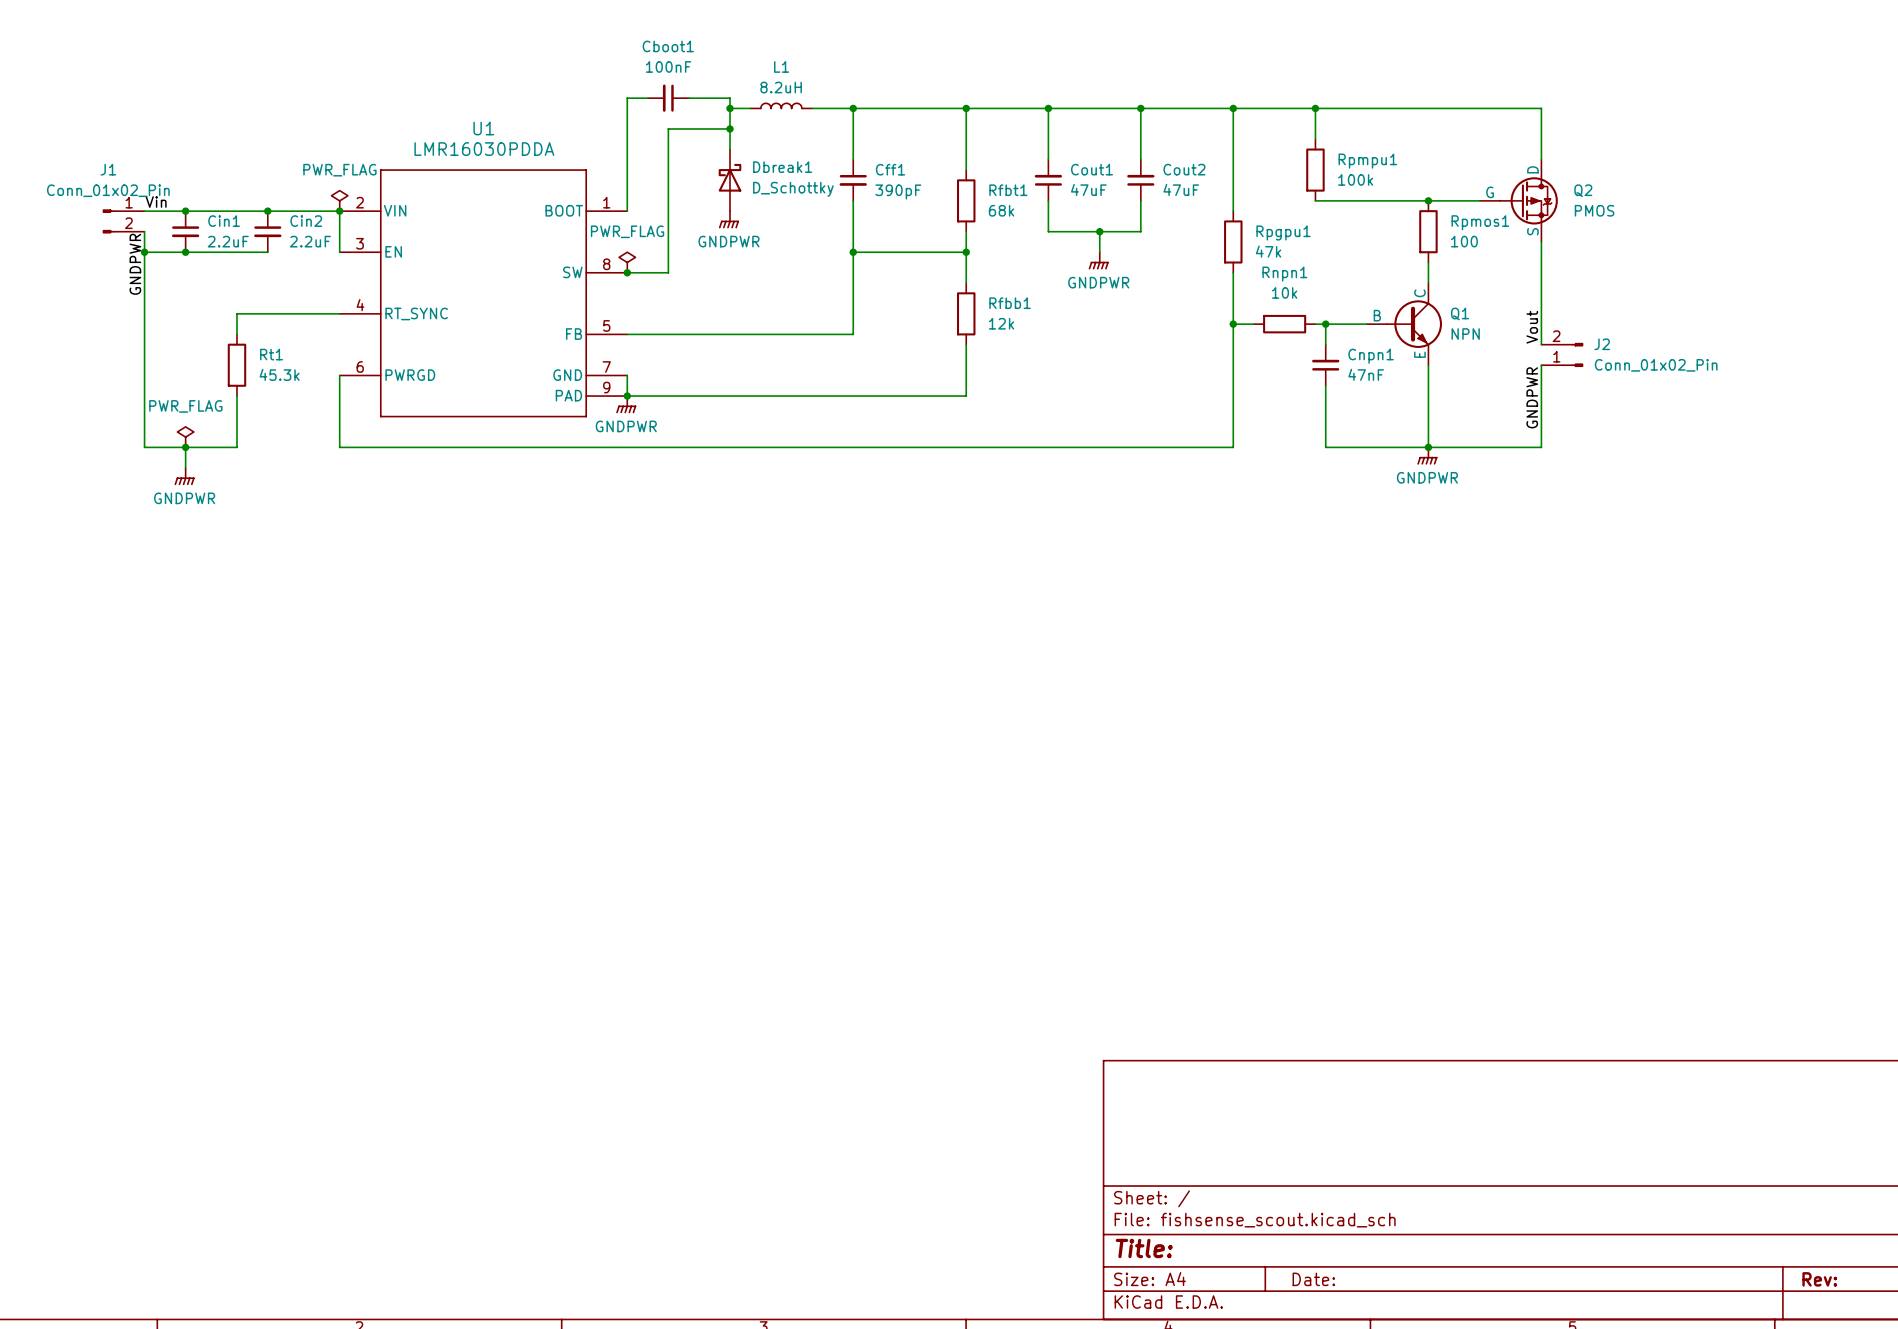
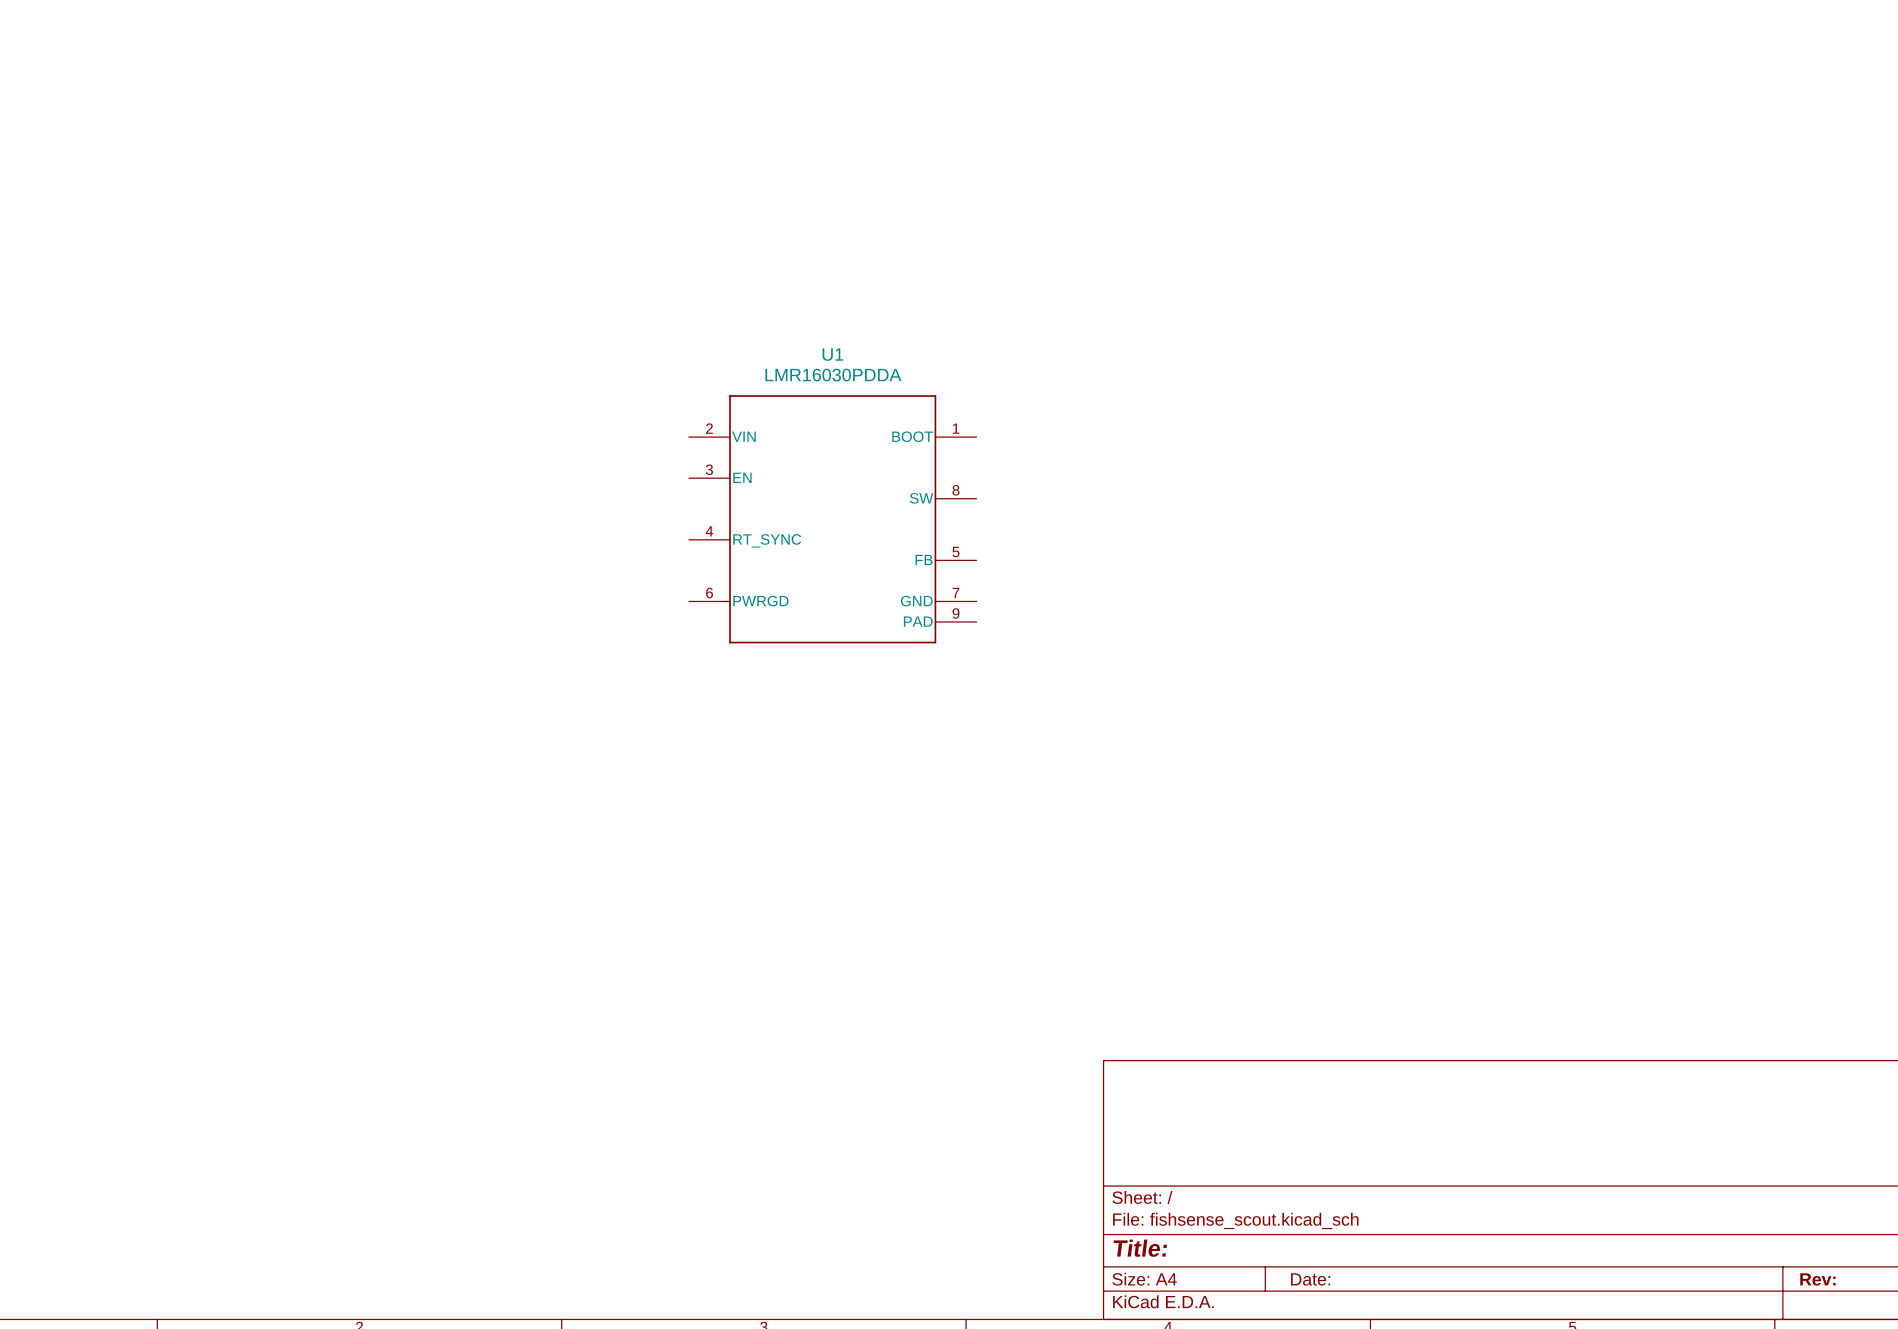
wire: (647, 98) (627, 98) (627, 211) -> none
Cboot1: 100nF (668, 98) -> none
wire: (688, 98) (730, 98) (730, 149) -> none
L1: 8.2uH (781, 105) -> none
wire: (730, 108) (750, 108) -> none
junction: (730, 108) -> none
wire: (812, 108) (1541, 108) (1541, 159) -> none
wire: (853, 108) (853, 159) -> none
junction: (853, 108) -> none
wire: (966, 108) (966, 170) -> none
junction: (966, 108) -> none
wire: (1048, 108) (1048, 159) -> none
junction: (1048, 108) -> none
wire: (1140, 108) (1140, 159) -> none
junction: (1140, 108) -> none
wire: (1233, 108) (1233, 211) -> none
junction: (1233, 108) -> none
wire: (1315, 108) (1315, 139) -> none
junction: (1315, 108) -> none
wire: (730, 128) (668, 128) (668, 272) (627, 272) -> none
junction: (730, 128) -> none
Rpmpu1: 100k (1315, 170) -> none
Dbreak1: D_Schottky (730, 180) -> none
Cff1: 390pF (853, 180) -> none
Cout1: 47uF (1048, 180) -> none
Cout2: 47uF (1140, 180) -> none
power symbol: PWR_FLAG (339, 200) -> none
wire: (853, 200) (853, 334) (627, 334) -> none
Rfbt1: 68k (966, 200) -> none
wire: (1048, 200) (1048, 231) (1140, 231) (1140, 200) -> none
wire: (1315, 200) (1479, 200) -> none
junction: (1428, 200) -> none
Q2: PMOS (1518, 200) -> none
label: Vin (156, 201) -> none
wire: (144, 211) (339, 211) (339, 252) -> none
junction: (185, 211) -> none
junction: (267, 211) -> none
junction: (339, 211) -> none
power symbol: GNDPWR (728, 219) -> none
J1: Conn_01x02_Pin (123, 221) -> none
wire: (144, 231) (144, 447) (236, 447) (236, 396) -> none
Cin1: 2.2uF (185, 231) -> none
Cin2: 2.2uF (267, 231) -> none
wire: (966, 231) (966, 283) -> none
wire: (1099, 231) (1099, 252) -> none
junction: (1099, 231) -> none
Rpmos1: 100 (1428, 231) -> none
Rpgpu1: 47k (1233, 241) -> none
wire: (1541, 241) (1541, 344) -> none
wire: (144, 252) (267, 252) -> none
junction: (144, 252) -> none
junction: (185, 252) -> none
wire: (853, 252) (966, 252) -> none
junction: (853, 252) -> none
junction: (966, 252) -> none
power symbol: GNDPWR (1098, 260) -> none
power symbol: PWR_FLAG (627, 262) -> none
wire: (1428, 262) (1428, 283) -> none
label: GNDPWR (135, 264) -> none
junction: (627, 272) -> none
wire: (1233, 272) (1233, 447) (339, 447) (339, 375) -> none
U1 position: (483, 293) -> (832, 519)
wire: (339, 313) (236, 313) (236, 334) -> none
Rfbb1: 12k (966, 313) -> none
wire: (1233, 324) (1253, 324) -> none
junction: (1233, 324) -> none
Rnpn1: 10k (1284, 324) -> none
wire: (1315, 324) (1366, 324) -> none
wire: (1325, 324) (1325, 344) -> none
junction: (1325, 324) -> none
Q1: NPN (1404, 324) -> none
label: Vout (1532, 327) -> none
wire: (966, 344) (966, 396) (627, 396) (627, 375) -> none
J2: Conn_01x02_Pin (1562, 354) -> none
Rt1: 45.3k (236, 365) -> none
Cnpn1: 47nF (1325, 365) -> none
wire: (1428, 365) (1428, 447) -> none
wire: (1541, 365) (1541, 447) (1325, 447) (1325, 385) -> none
junction: (627, 396) -> none
label: GNDPWR (1532, 397) -> none
power symbol: GNDPWR (626, 404) -> none
power symbol: PWR_FLAG (185, 437) -> none
wire: (185, 447) (185, 467) -> none
junction: (185, 447) -> none
junction: (1428, 447) -> none
power symbol: GNDPWR (1427, 456) -> none
power symbol: GNDPWR (184, 476) -> none

